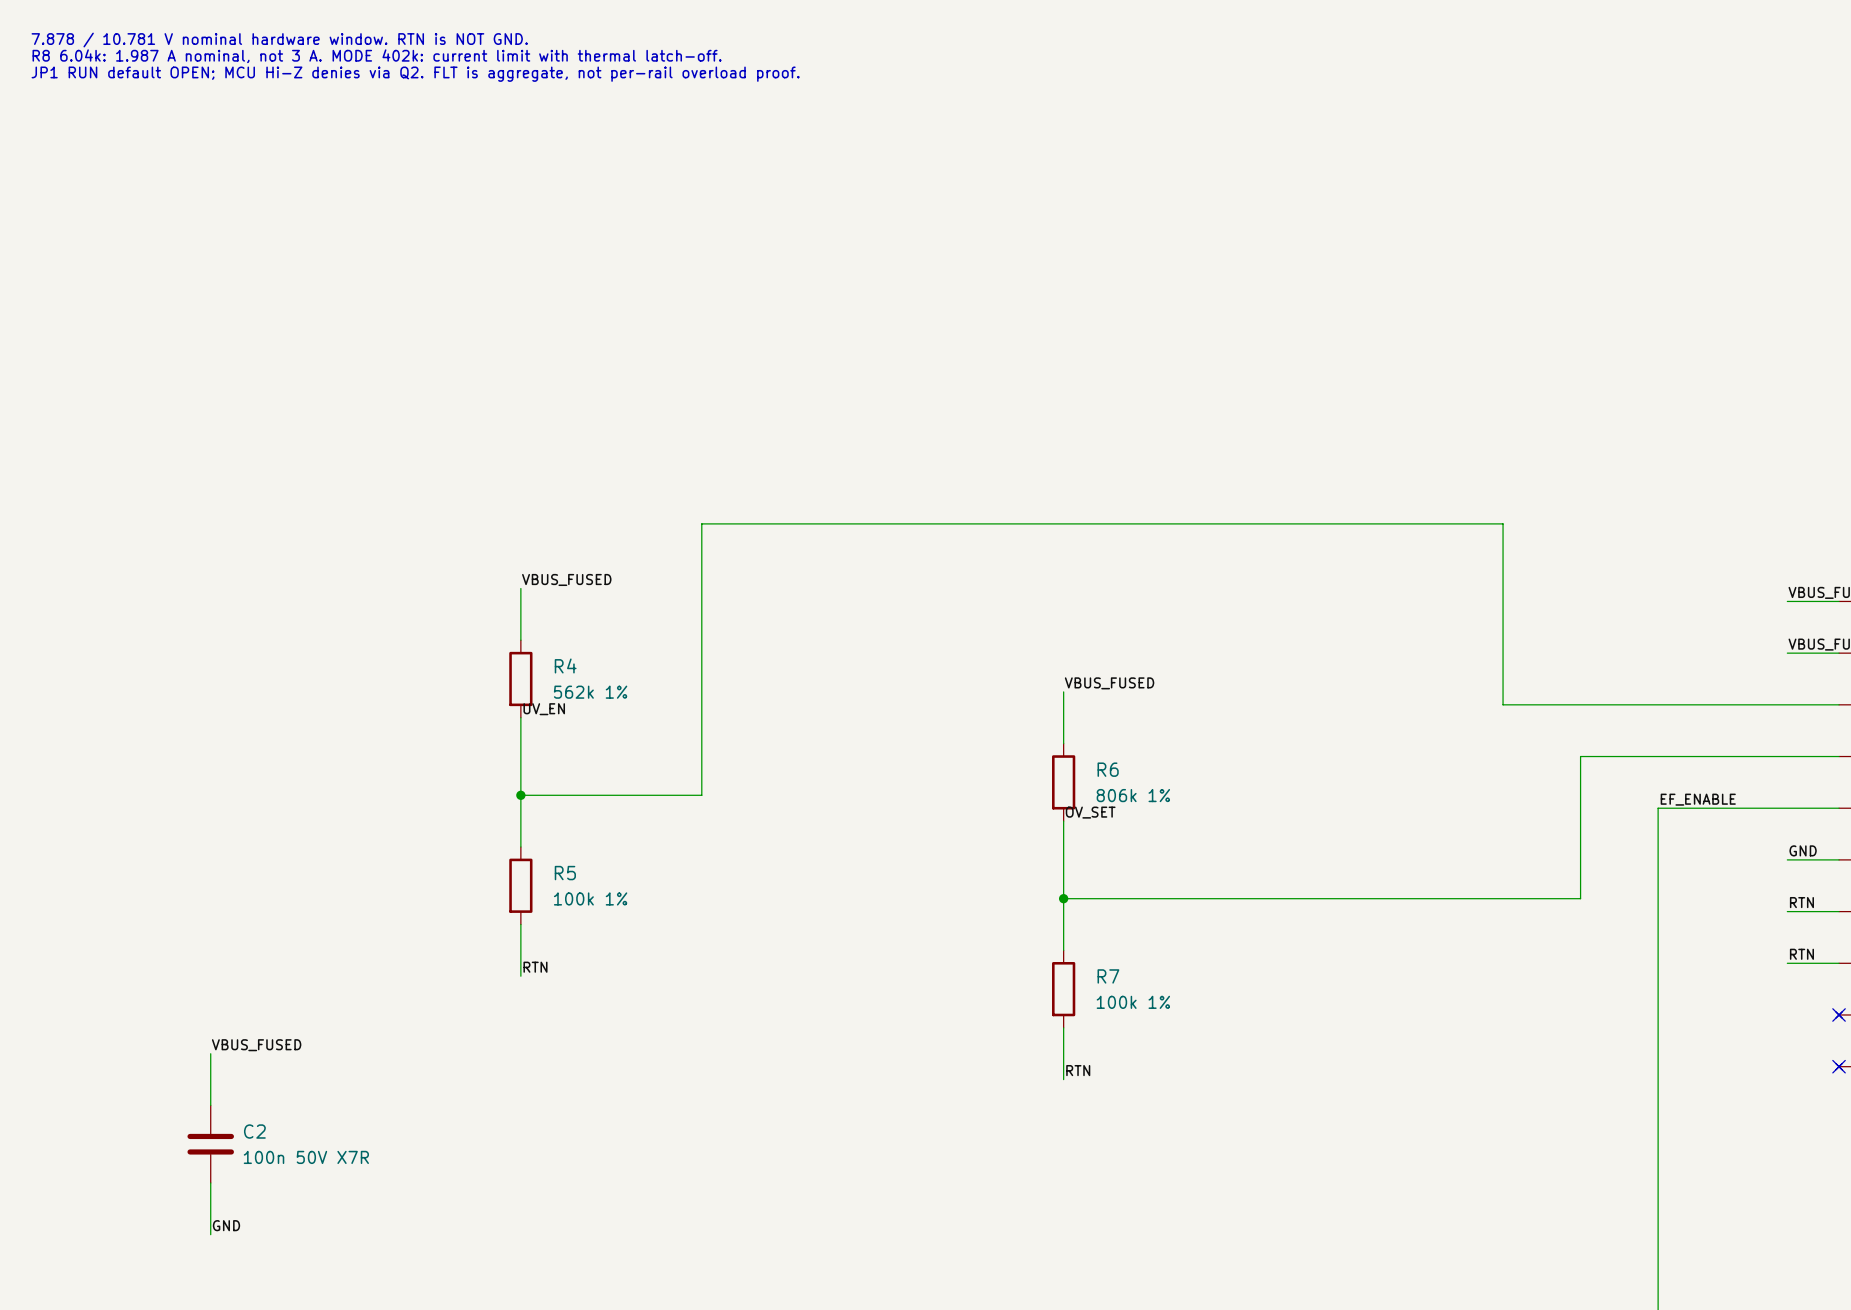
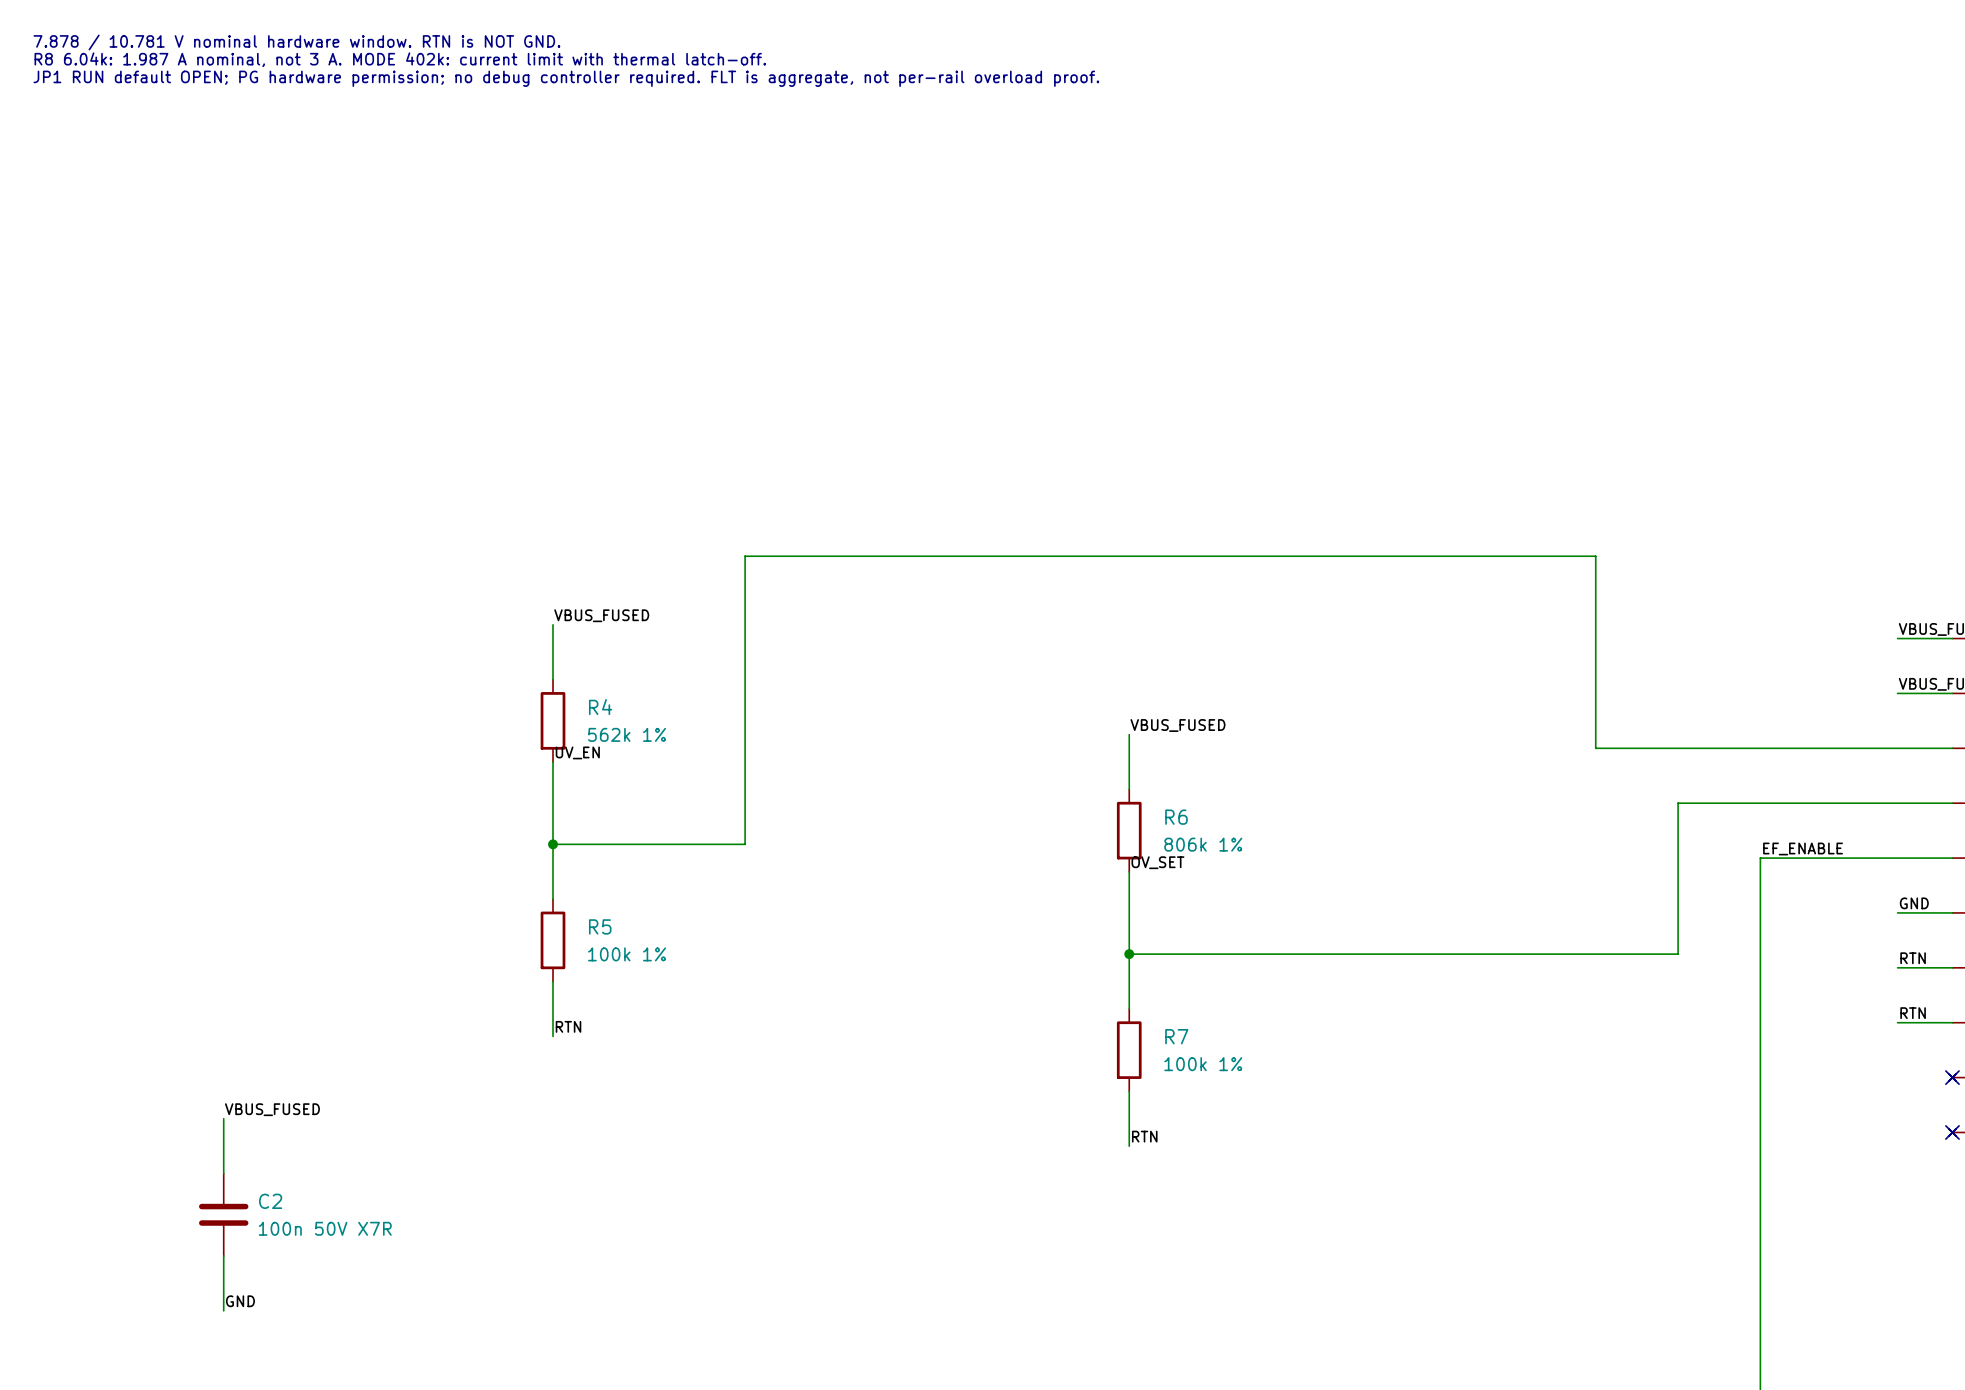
text: JP1 RUN default OPEN; MCU Hi-Z denies via Q2. FLT is aggregate, not per-rail overload proof. (415, 74) -> JP1 RUN default OPEN; PG hardware permission; no debug controller required. FLT is aggregate, not per-rail overload proof. (566, 78)

